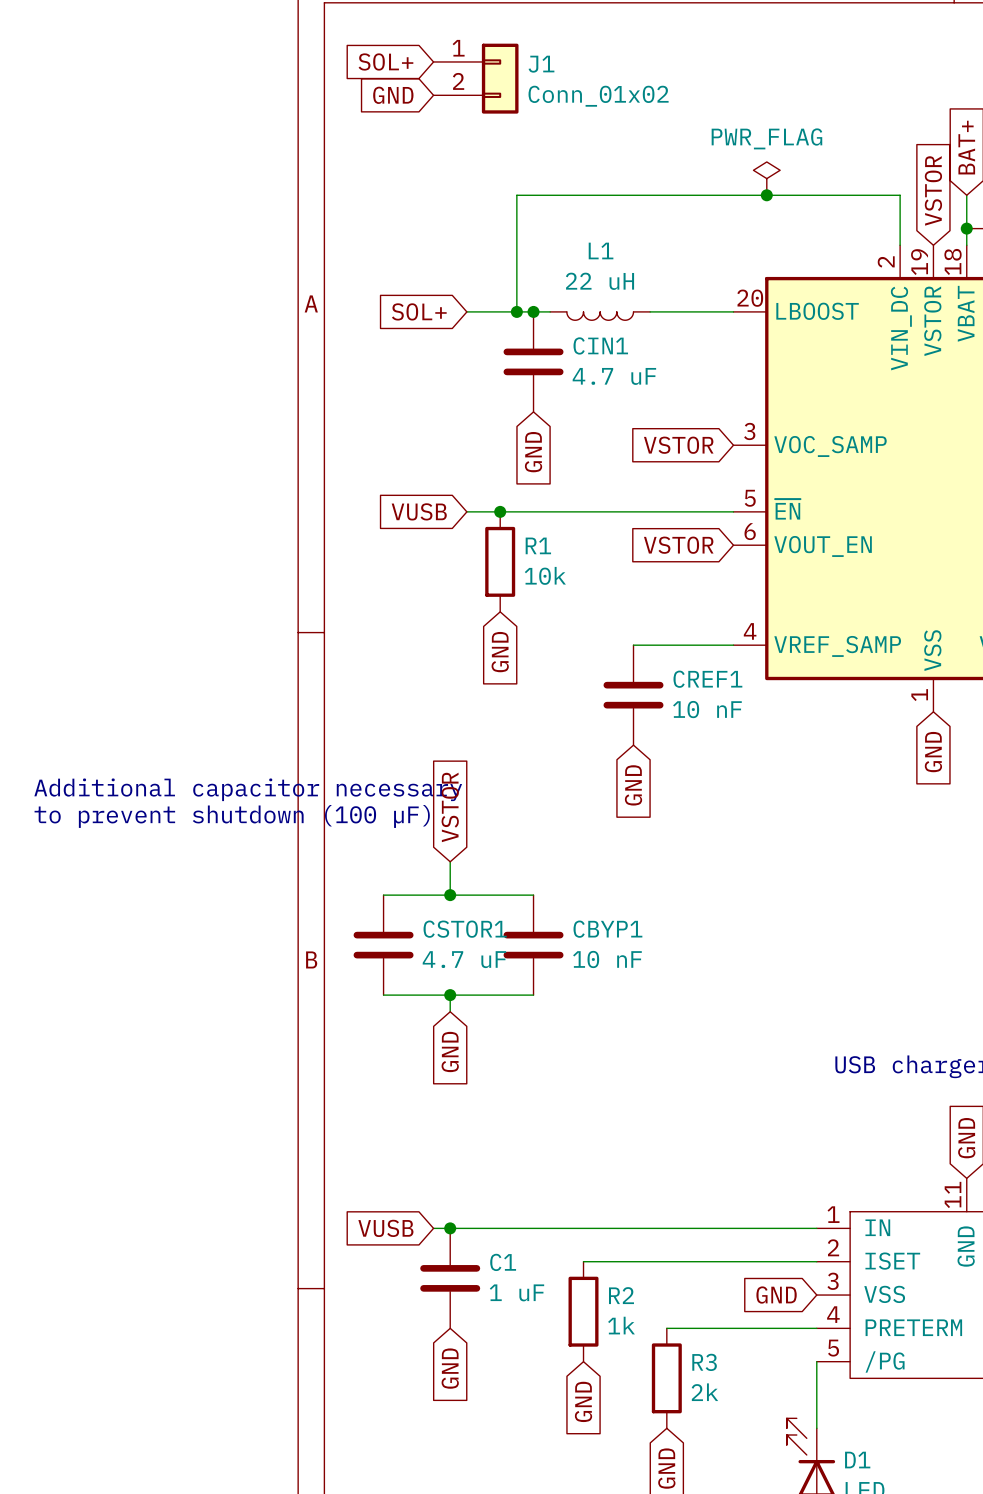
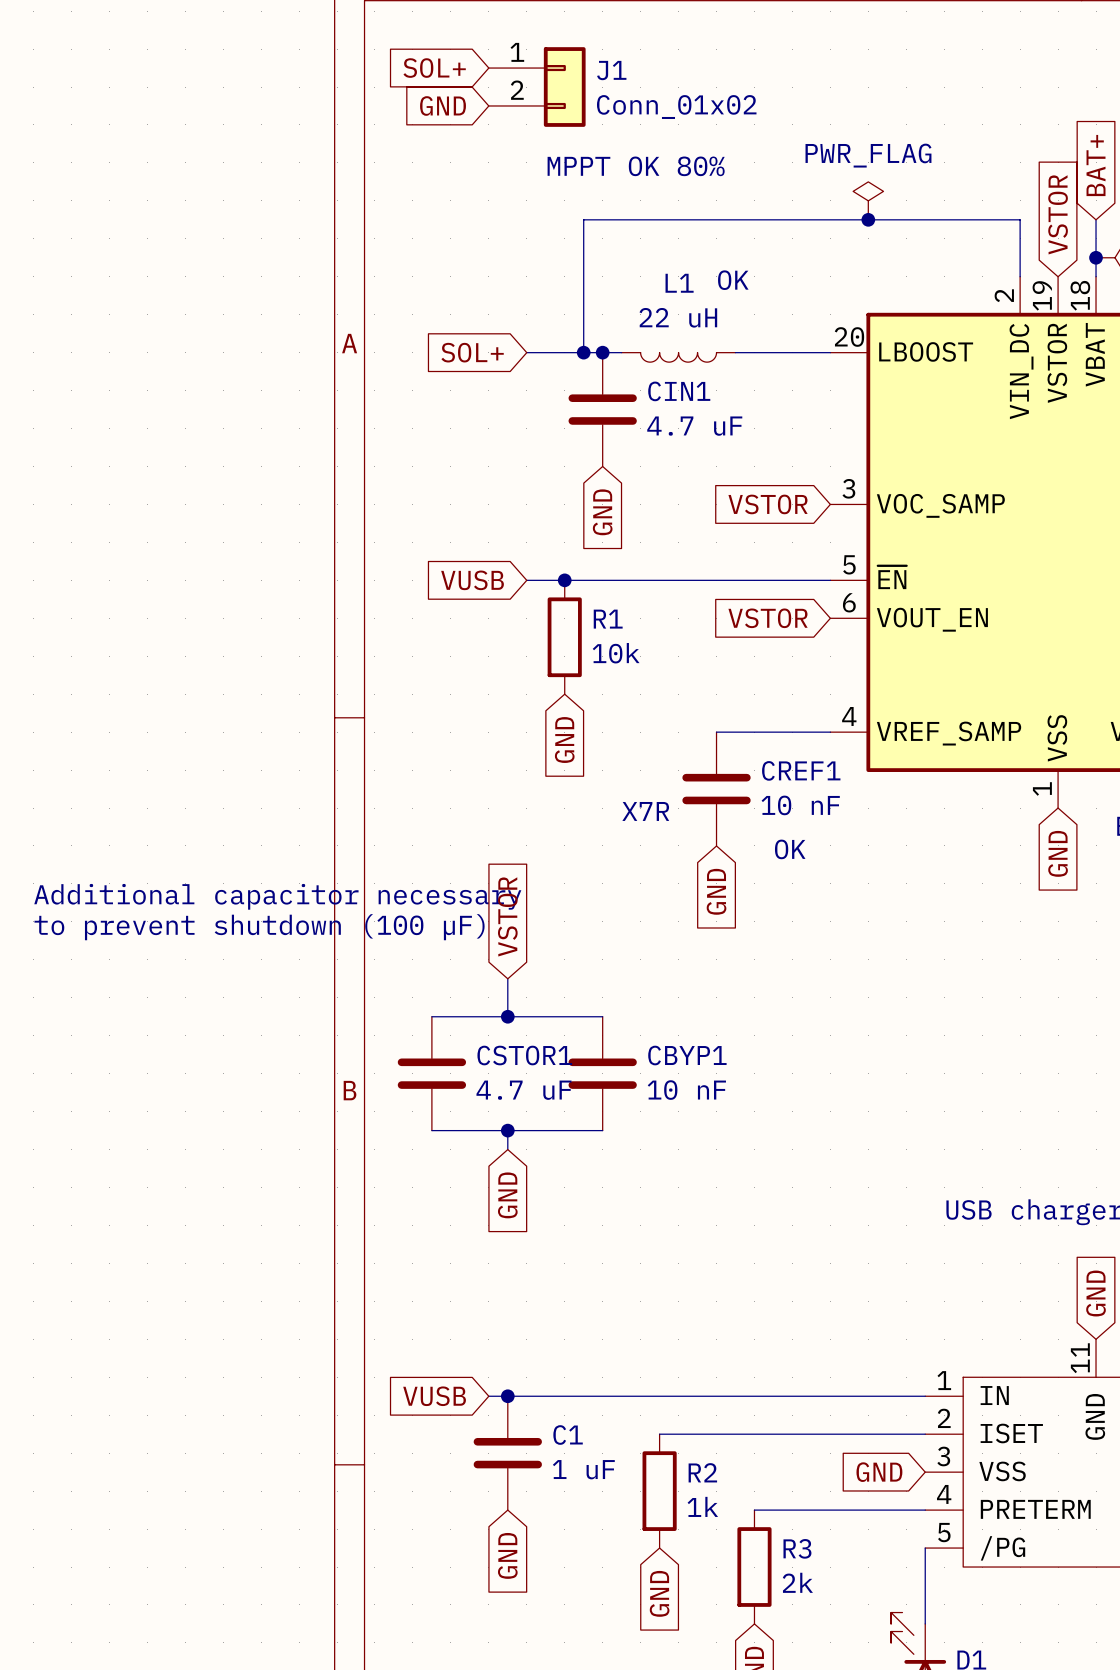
text: none -> MPPT OK 80% (636, 166)
text: none -> OK (733, 280)
text: none -> X7R (645, 811)
text: none -> OK (790, 849)

